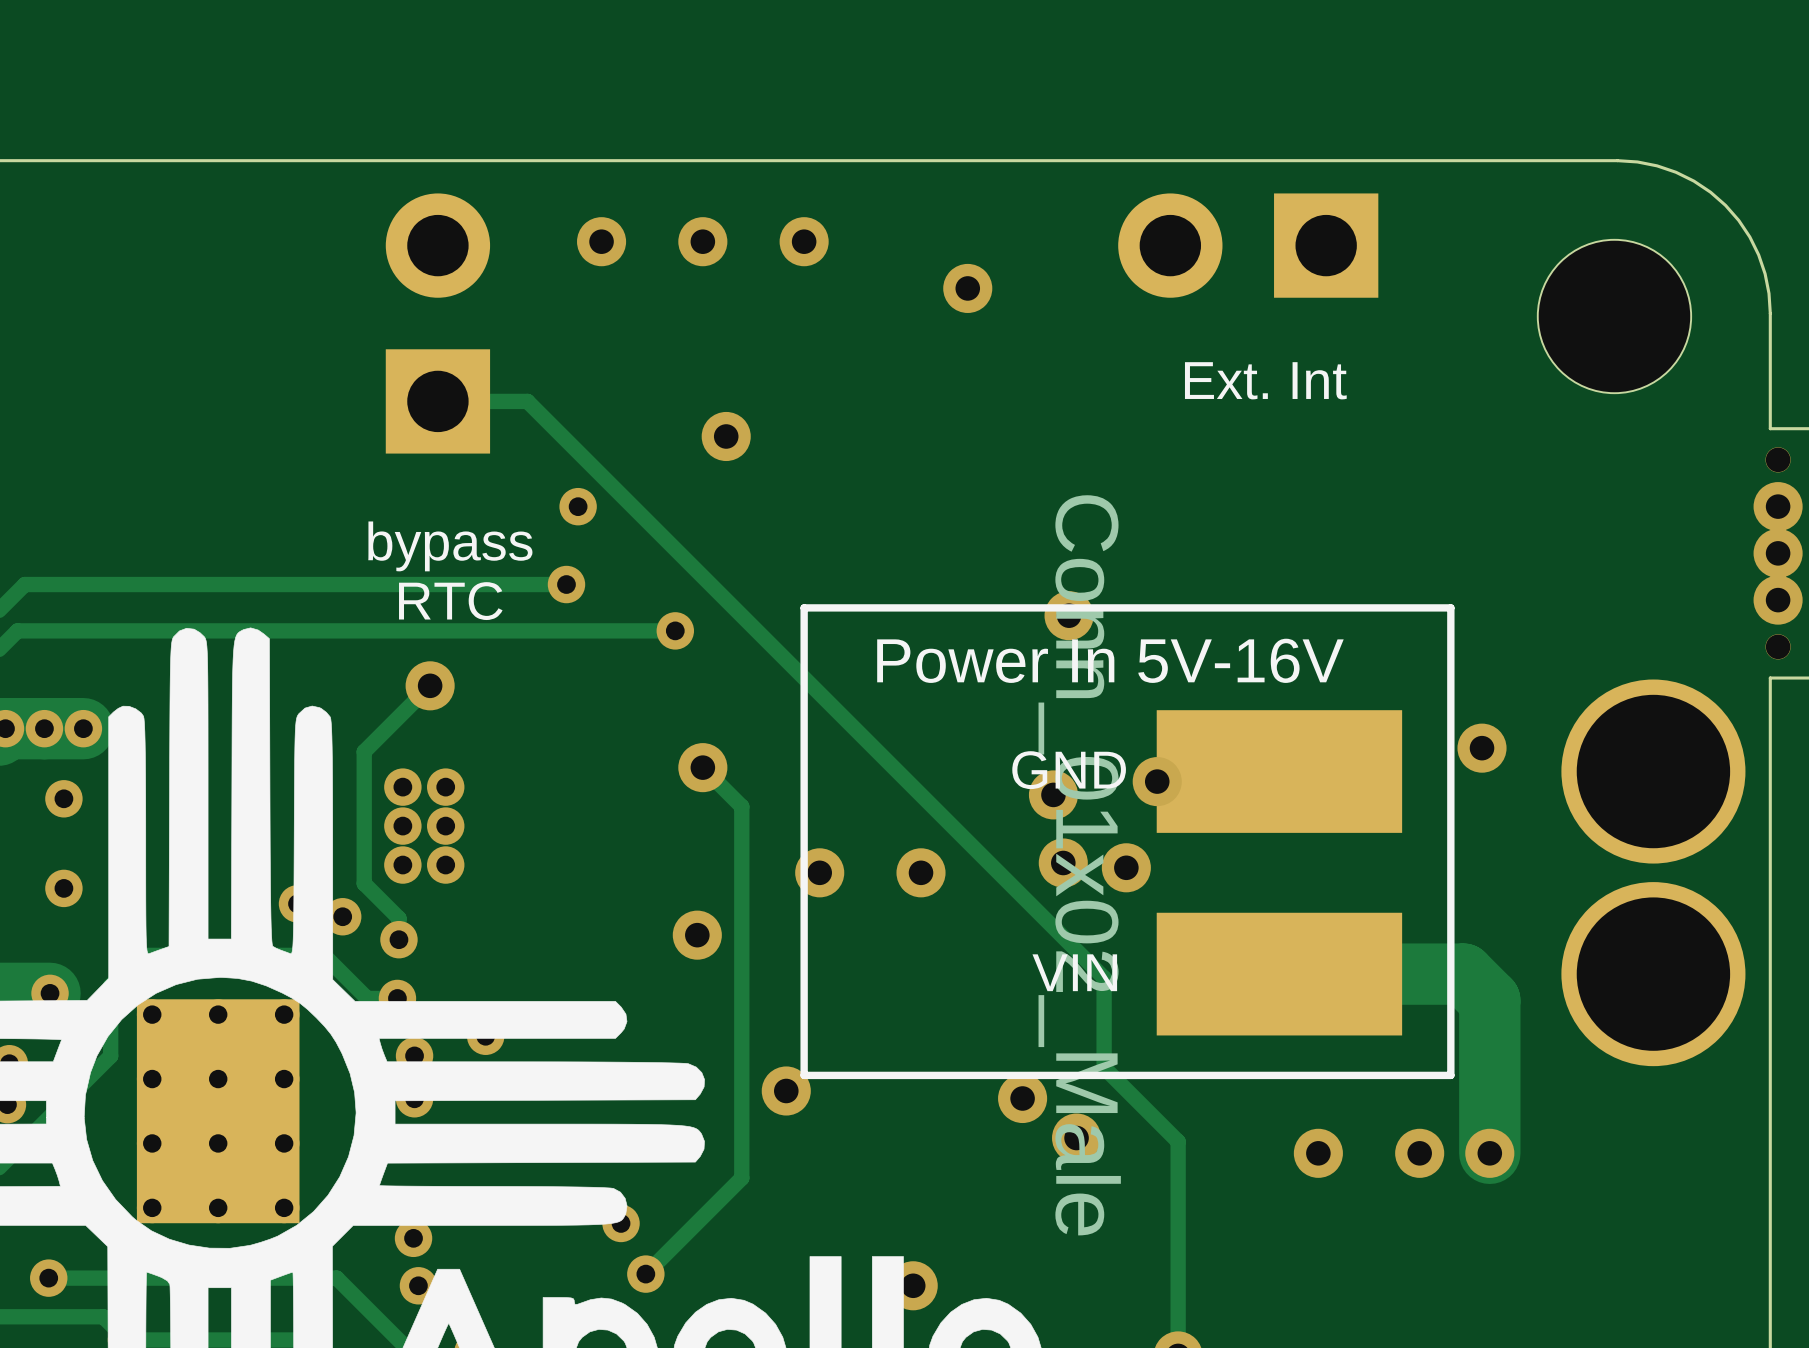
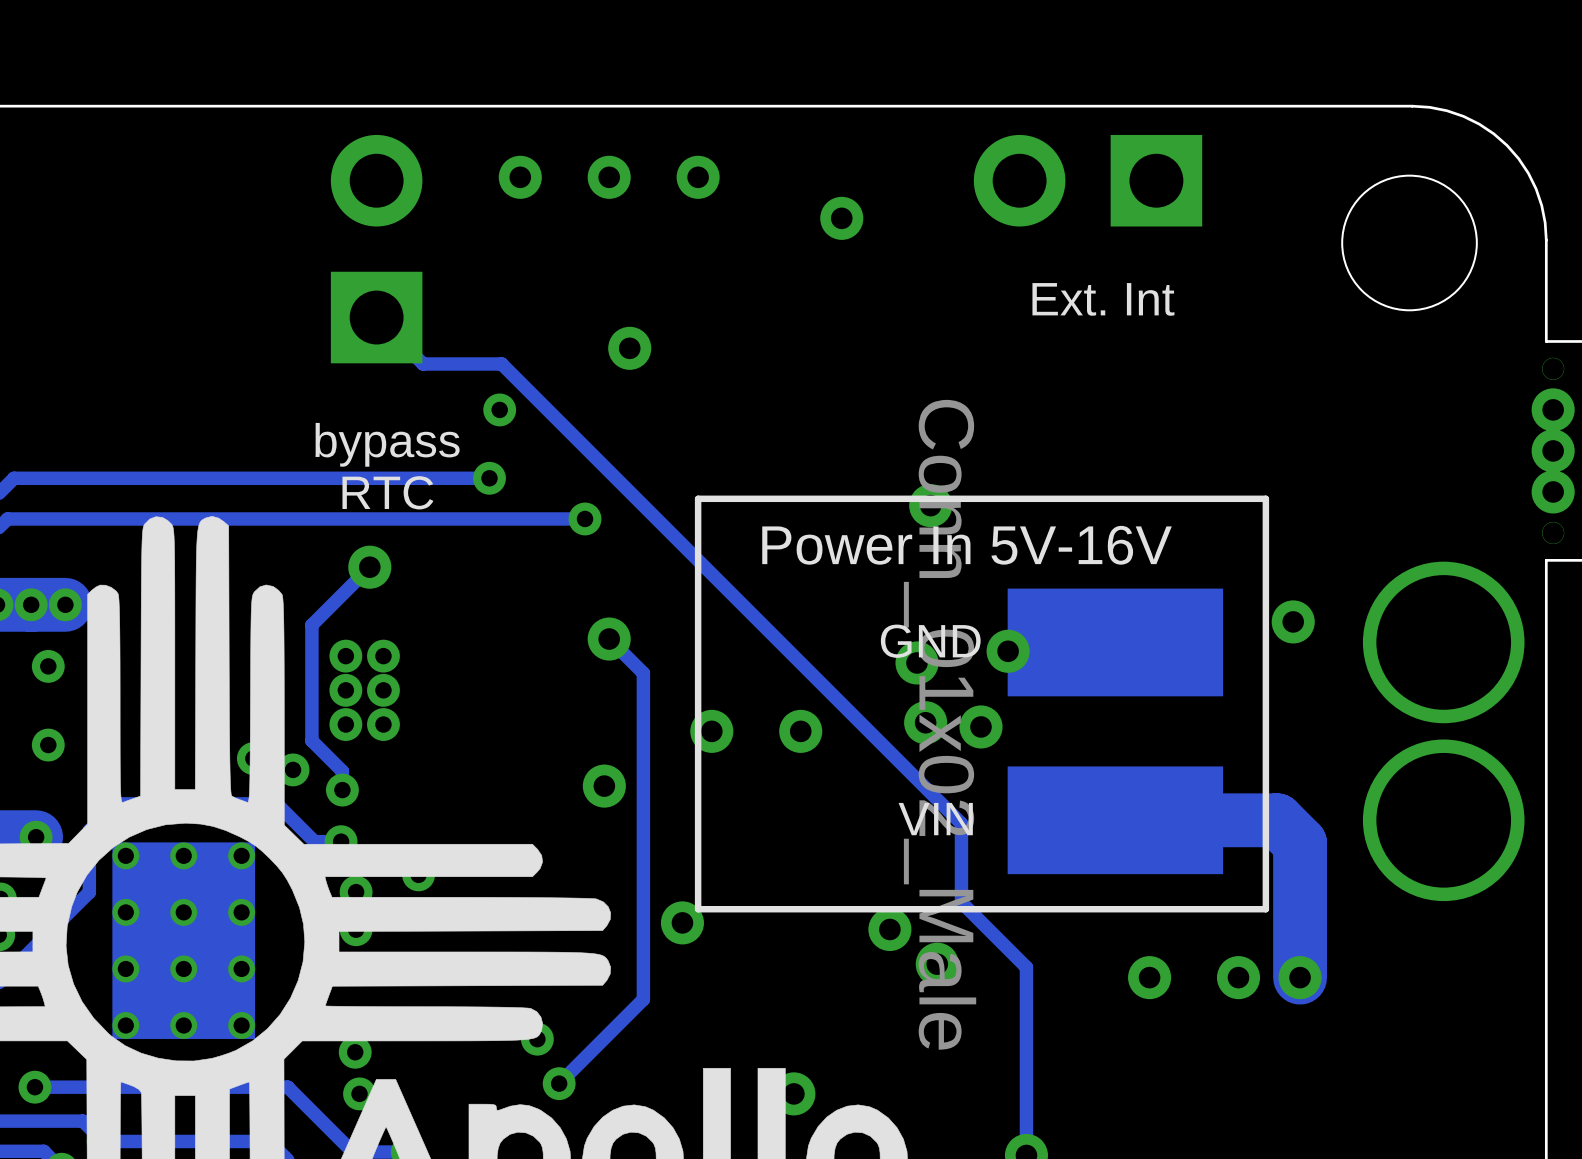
track: (437, 401) (527, 401) (580, 454) -> (376, 317) (423, 363) (501, 363)

